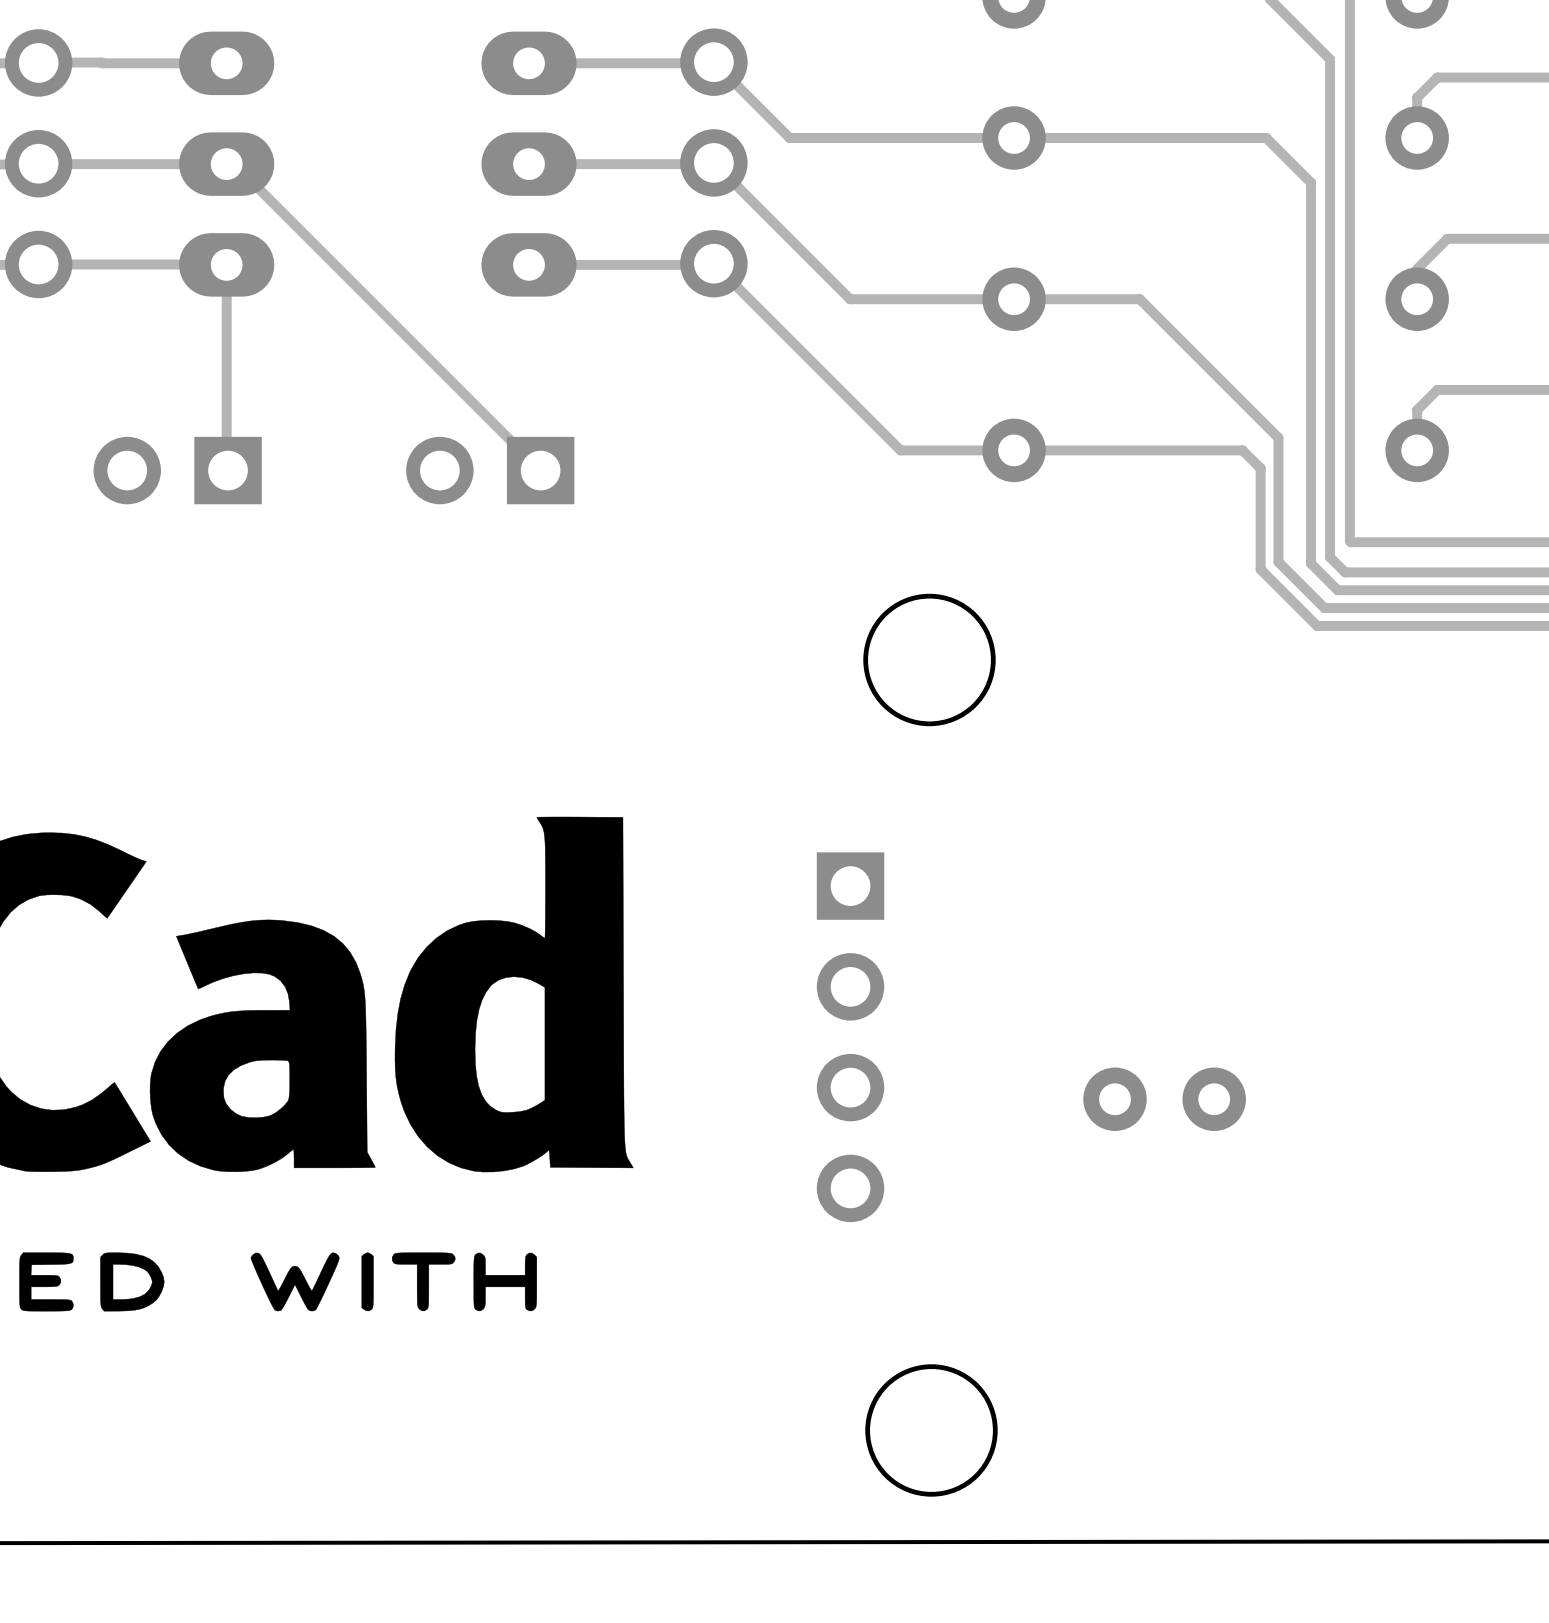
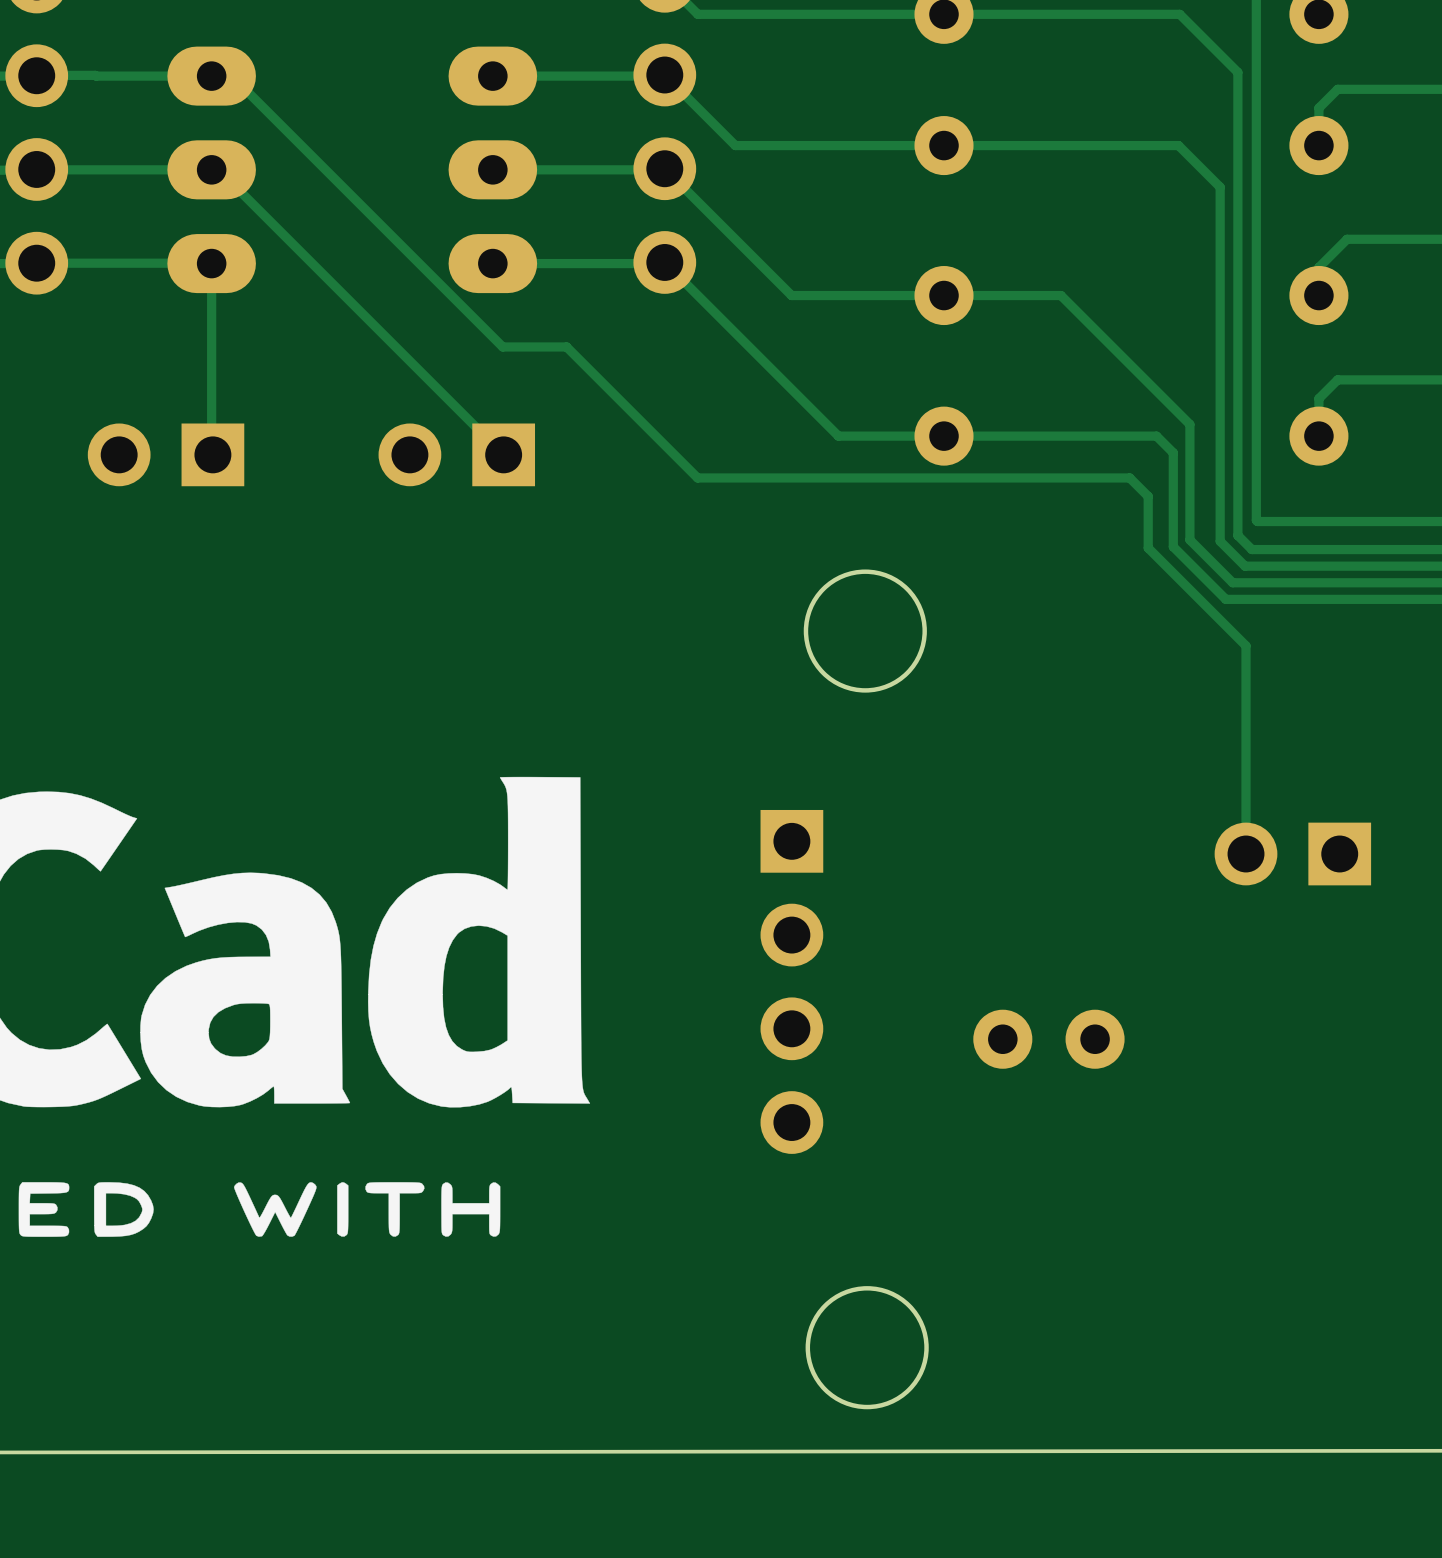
track: none -> (211, 76) (231, 76) (502, 346) (566, 346) (697, 477) (1129, 477) (1148, 496) (1148, 548) (1246, 645) (1246, 853)
part: none -> (1292, 853)
part position: (1164, 1099) -> (1048, 1039)

